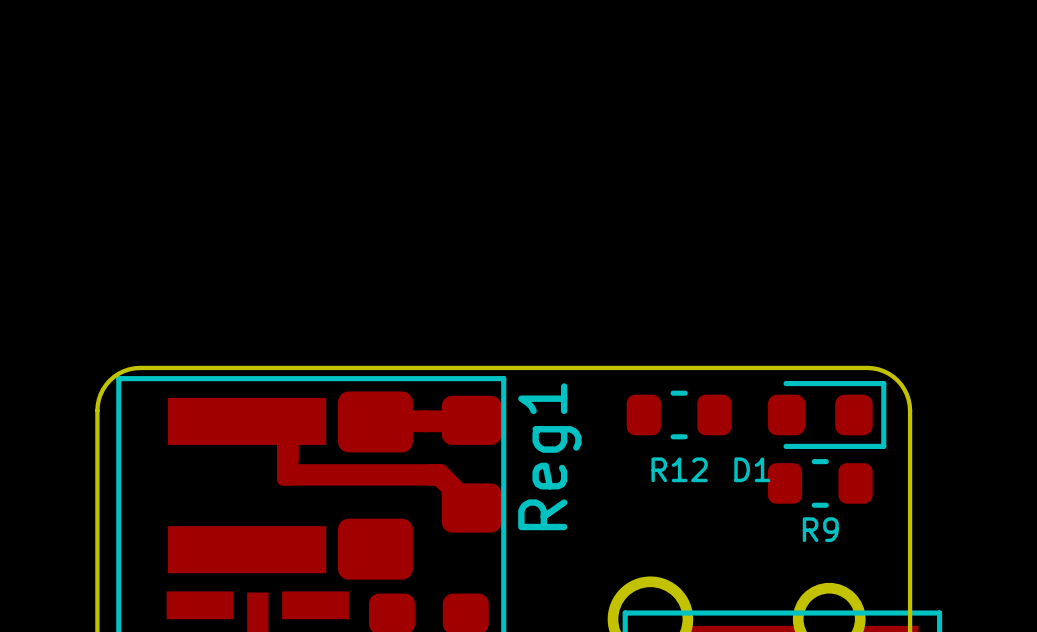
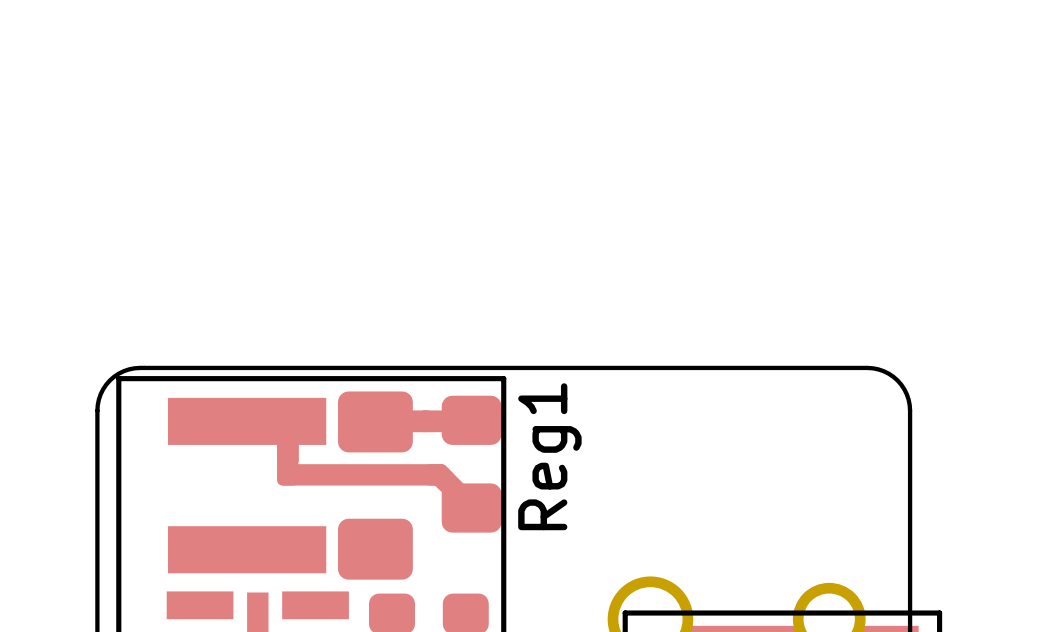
R12: (679, 414) -> none
D1: (827, 414) -> none
R9: (820, 483) -> none

